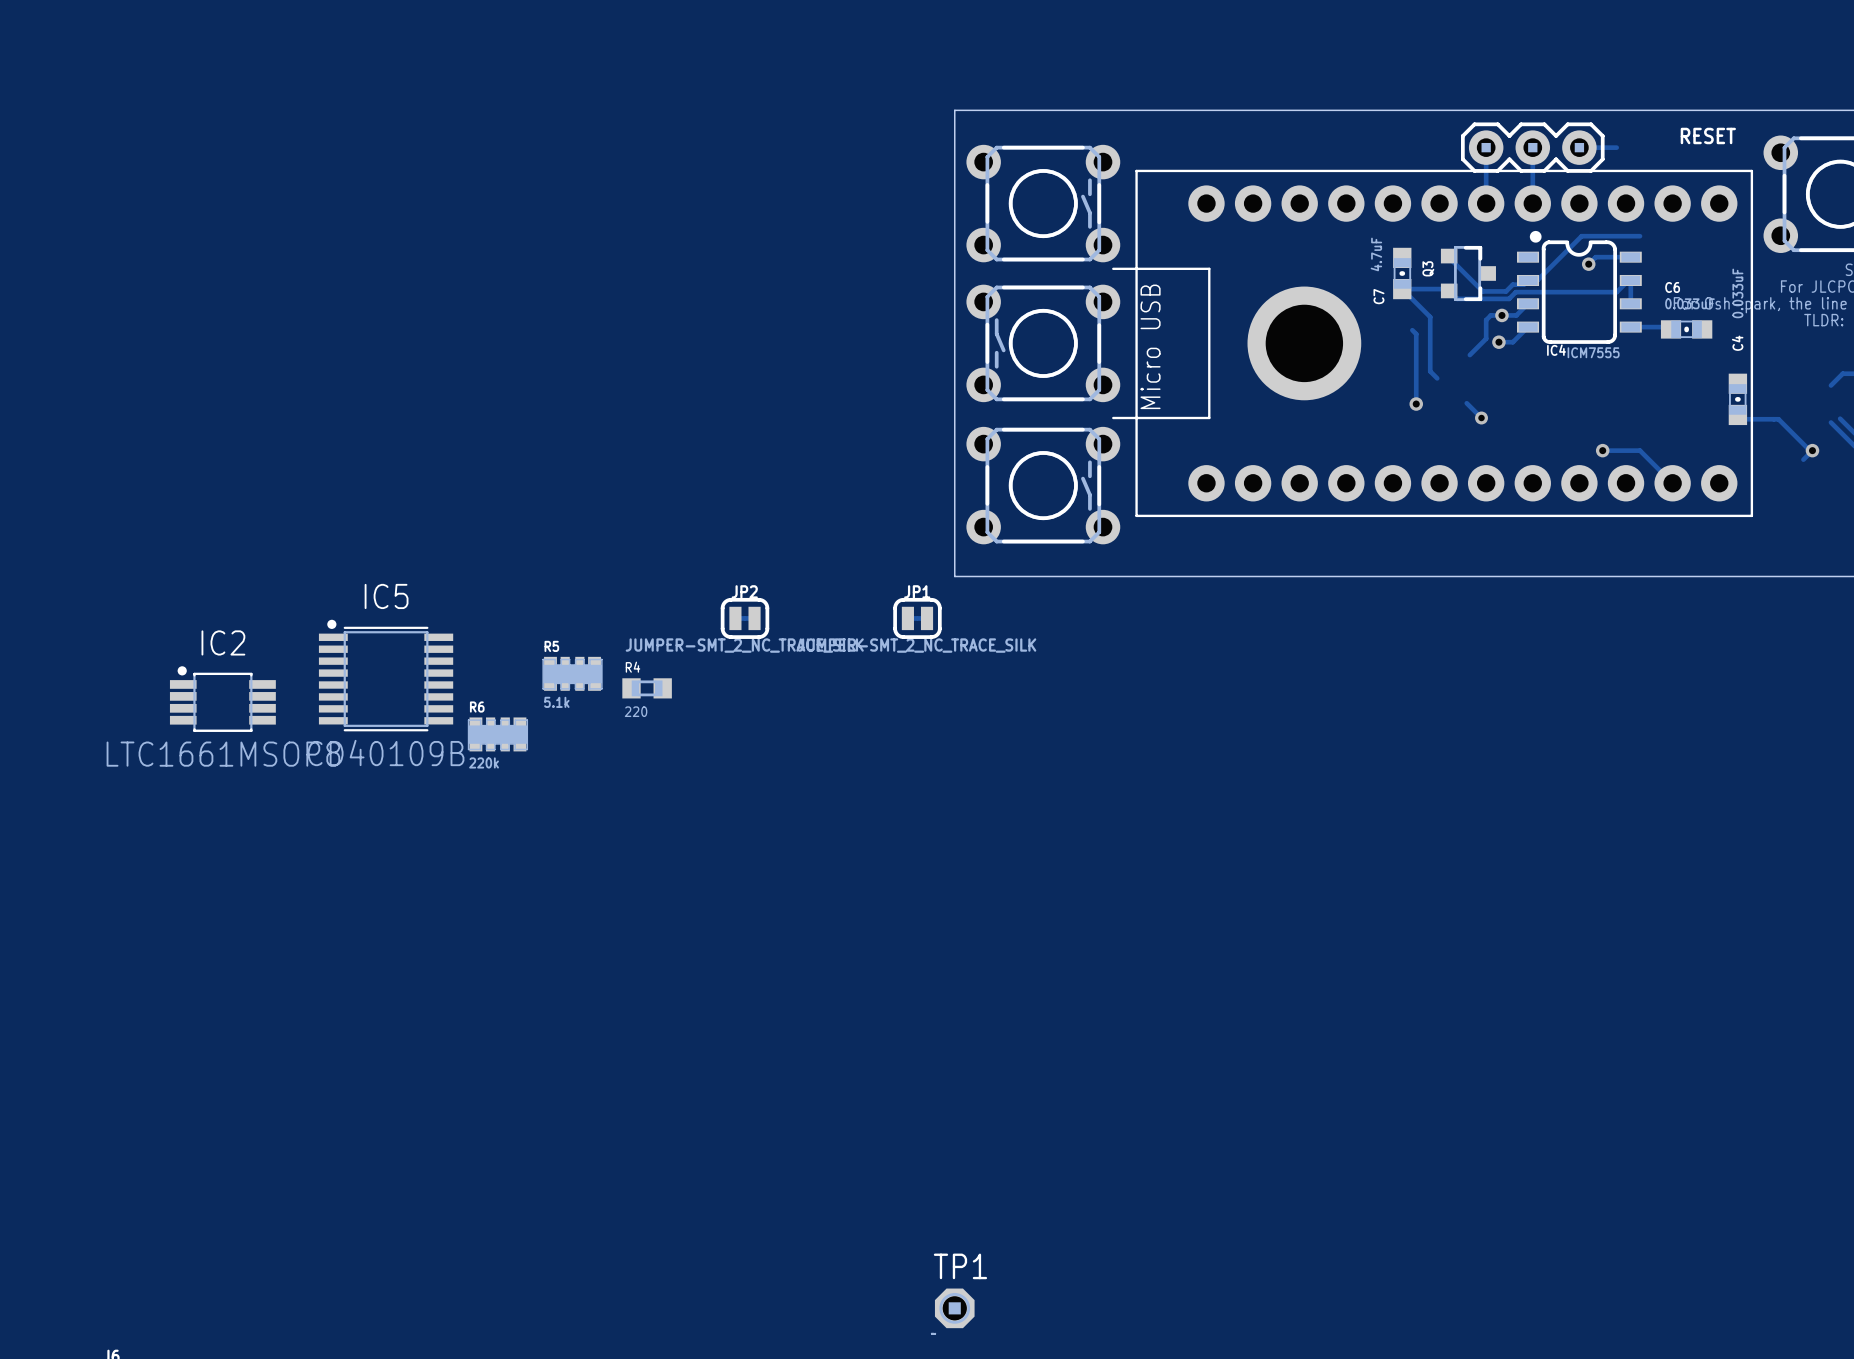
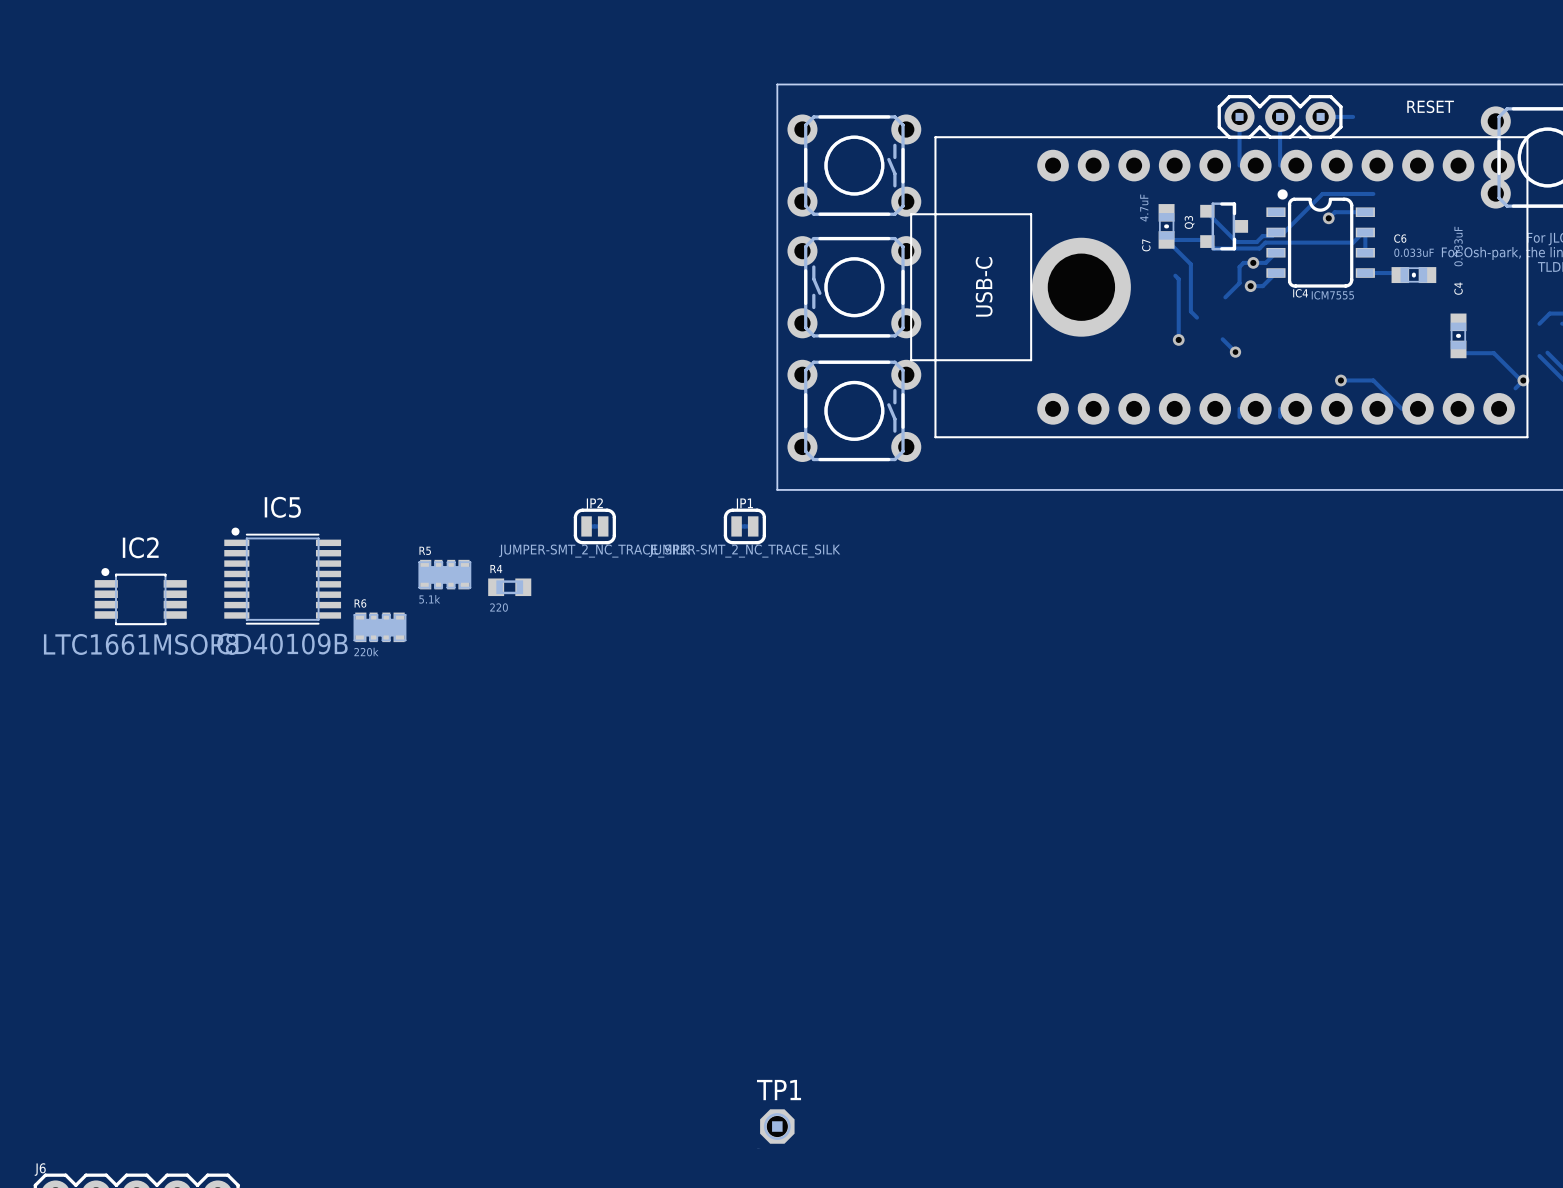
part: (1432, 343) -> none
part: none -> (1219, 287)

